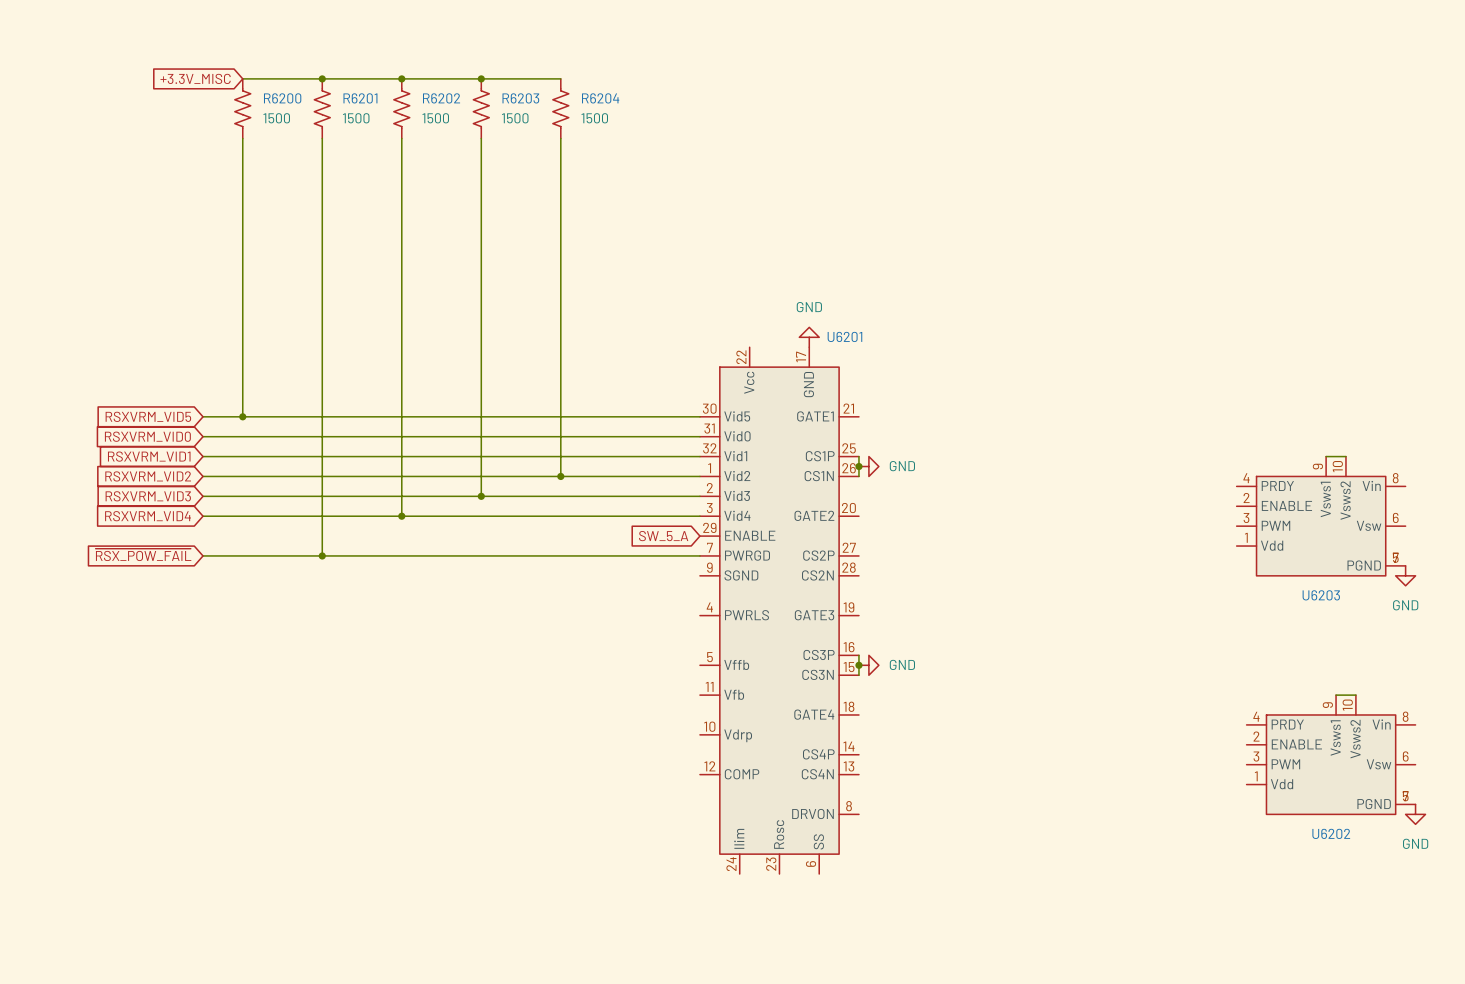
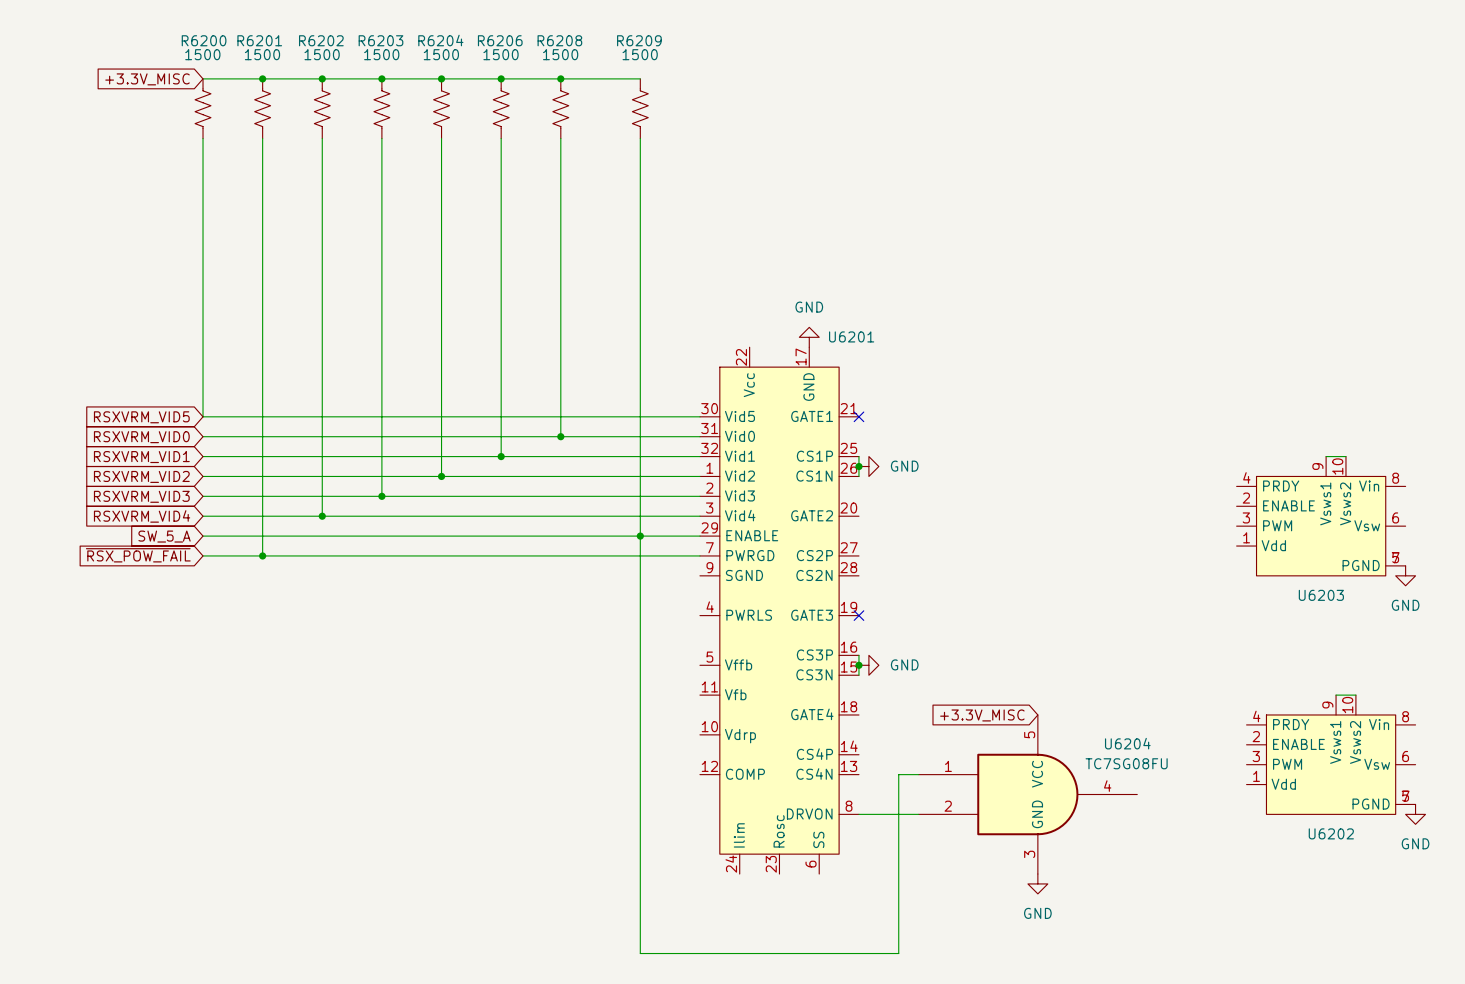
global label position: +3.3V_MISC (195, 78) -> +3.3V_MISC (147, 79)
wire: none -> (203, 78) (242, 78)
junction: none -> (262, 78)
junction: none -> (381, 78)
junction: (401, 78) -> none
junction: none -> (441, 78)
junction: (481, 78) -> none
junction: none -> (501, 78)
wire: none -> (560, 78) (640, 78)
junction: none -> (560, 78)
R6200 name position: R6200 (282, 98) -> R6200 (204, 40)
R6201 name: R6201 (360, 98) -> R6202 (321, 40)
R6203 name position: R6203 (520, 98) -> R6203 (380, 40)
R6204 name: R6204 (600, 98) -> R6208 (559, 40)
R6200 position: (242, 108) -> (203, 108)
R6201: none -> 1500 (262, 108)
R6202: 1500 (401, 108) -> none
R6204: none -> 1500 (441, 108)
R6203 position: (481, 108) -> (381, 108)
R6206: none -> 1500 (501, 108)
R6209: none -> 1500 (640, 108)
R6200 value position: 1500 (276, 118) -> 1500 (202, 54)
R6201 value position: 1500 (356, 118) -> 1500 (322, 54)
R6203 value position: 1500 (515, 118) -> 1500 (381, 54)
R6204 value position: 1500 (594, 118) -> 1500 (560, 54)
wire: (242, 138) (242, 416) -> (203, 138) (203, 416)
wire: none -> (262, 138) (262, 555)
wire: (401, 138) (401, 516) -> none
wire: none -> (441, 138) (441, 476)
wire: (481, 138) (481, 496) -> (381, 138) (381, 496)
wire: none -> (501, 138) (501, 456)
wire: none -> (640, 138) (640, 953) (898, 953) (898, 774) (918, 774)
junction: (242, 416) -> none
no-connect mark: none -> (858, 416)
wire: (560, 436) (560, 476) -> none
junction: none -> (560, 436)
junction: none -> (501, 456)
junction: none -> (441, 476)
junction: (560, 476) -> none
junction: none -> (381, 496)
junction: (481, 496) -> none
wire: (322, 516) (322, 555) -> none
junction: none -> (322, 516)
junction: (401, 516) -> none
global label: none -> SW_5_A (164, 536)
wire: none -> (203, 536) (699, 536)
junction: none -> (640, 536)
global label: SW_5_A (663, 536) -> none
junction: none -> (262, 555)
junction: (322, 555) -> none
no-connect mark: none -> (858, 615)
global label: none -> +3.3V_MISC (982, 715)
U6204: none -> TC7SG08FU (1027, 794)
wire: none -> (858, 814) (918, 814)
power symbol: none -> GND (1037, 883)

